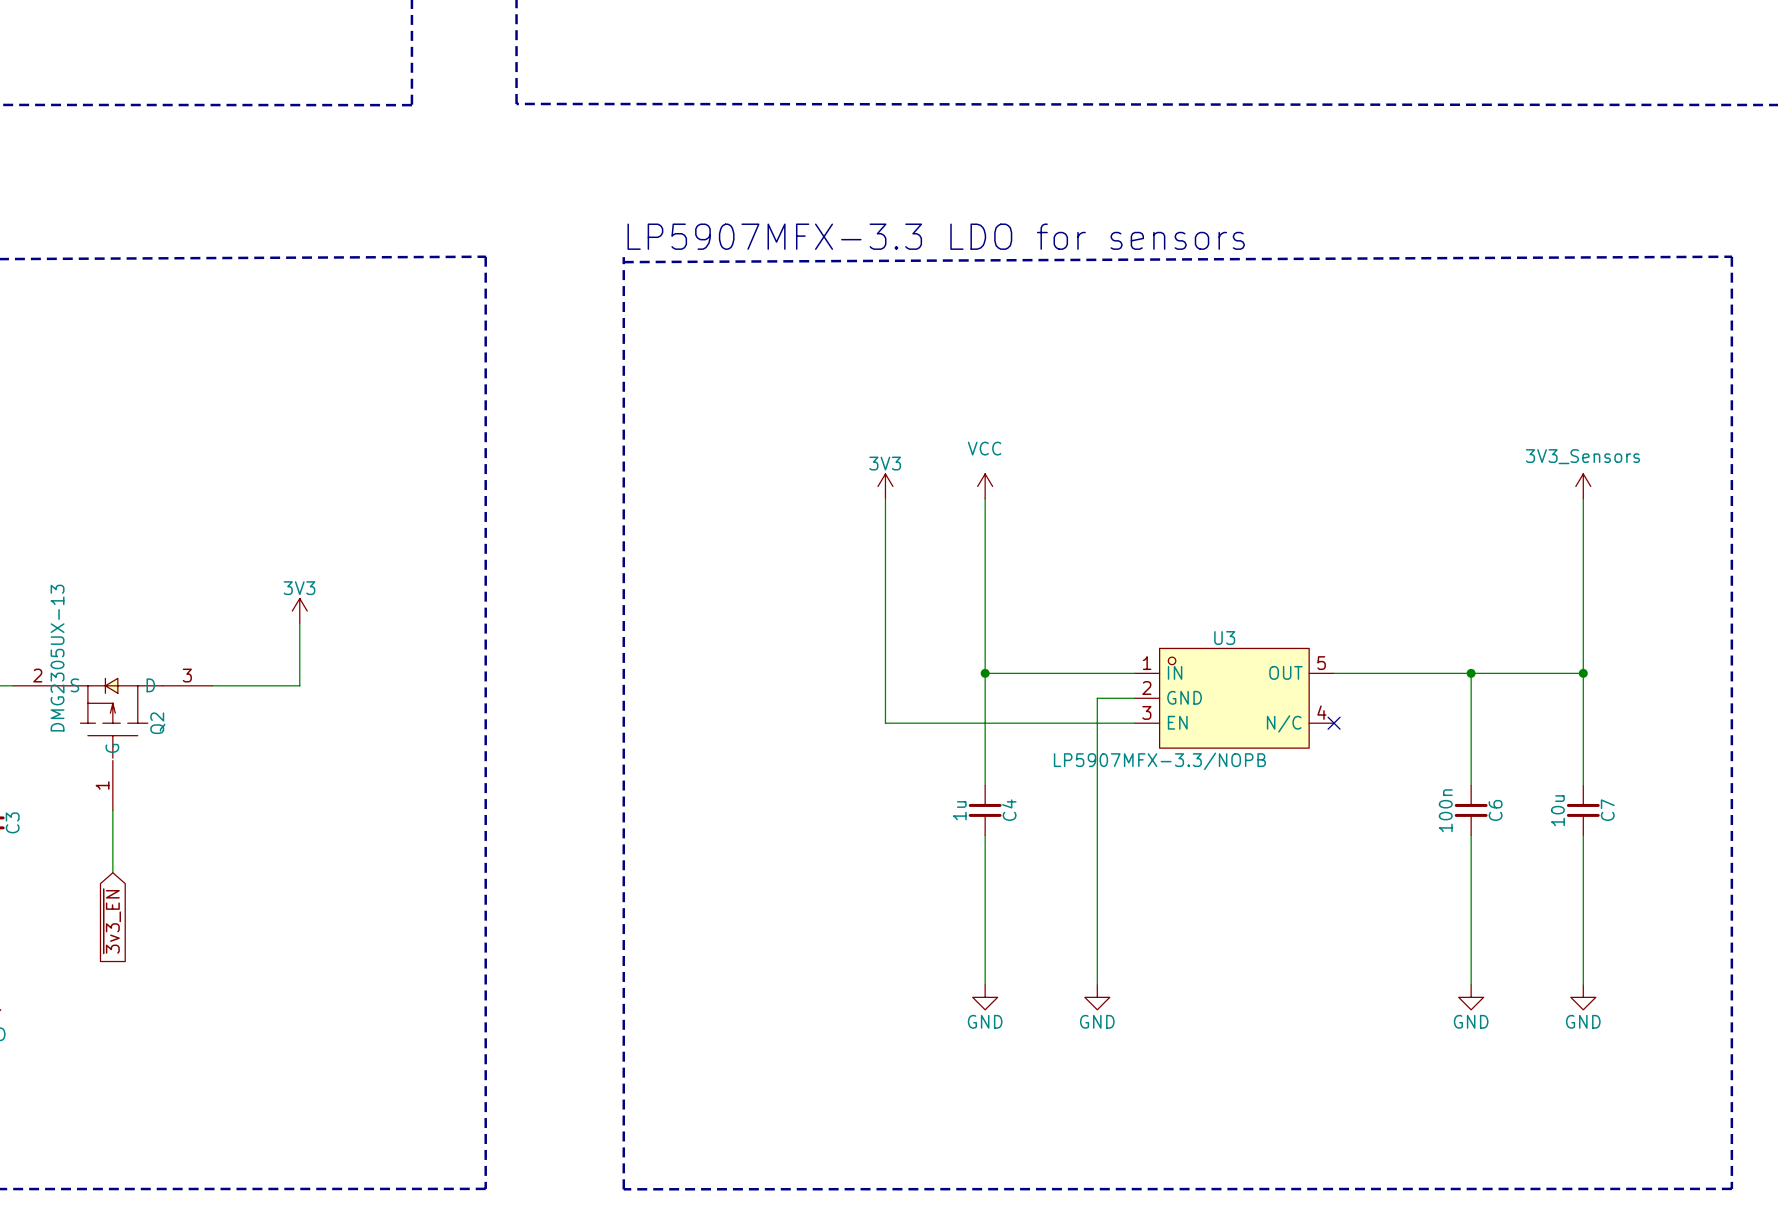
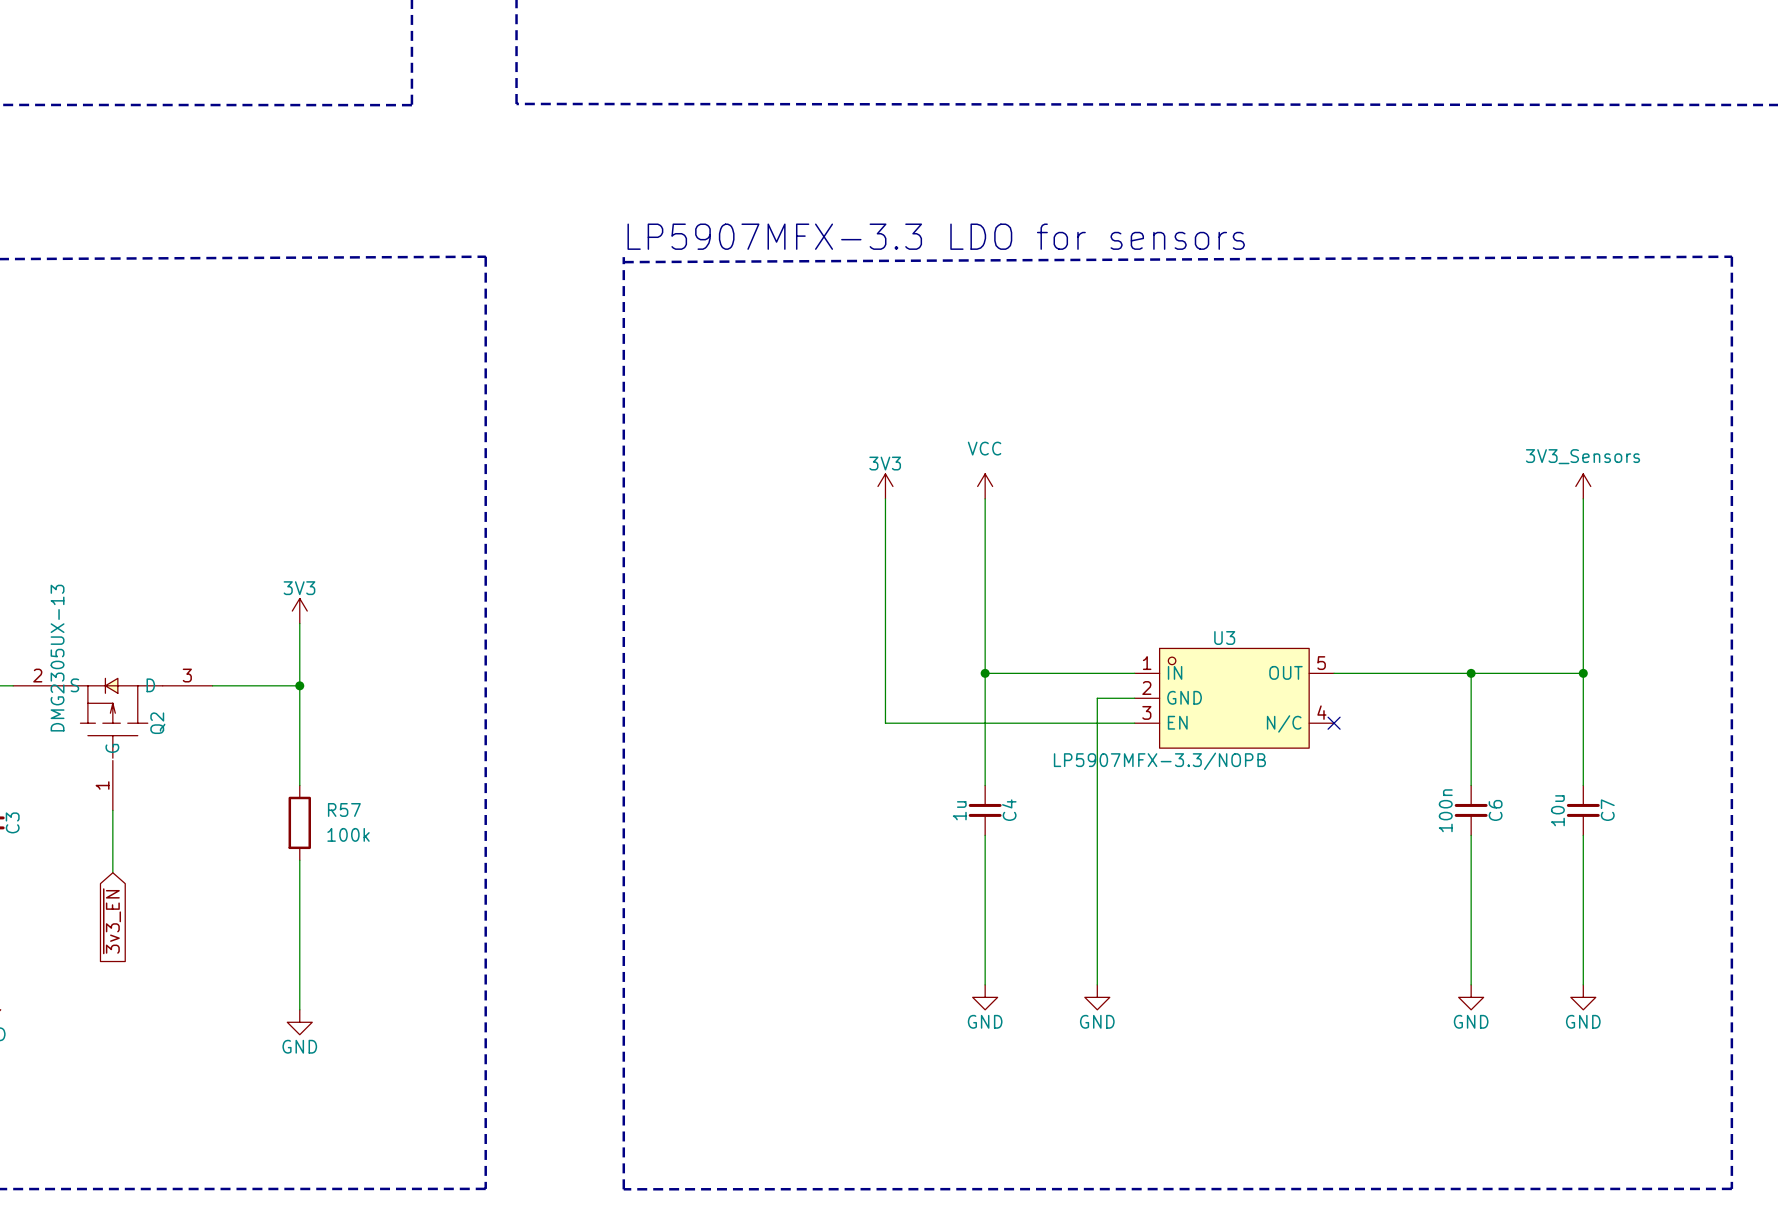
wire: none -> (299, 685) (299, 785)
junction: none -> (299, 685)
R57: none -> 100k (299, 822)
wire: none -> (299, 860) (299, 1009)
power symbol: none -> GND (299, 1022)

